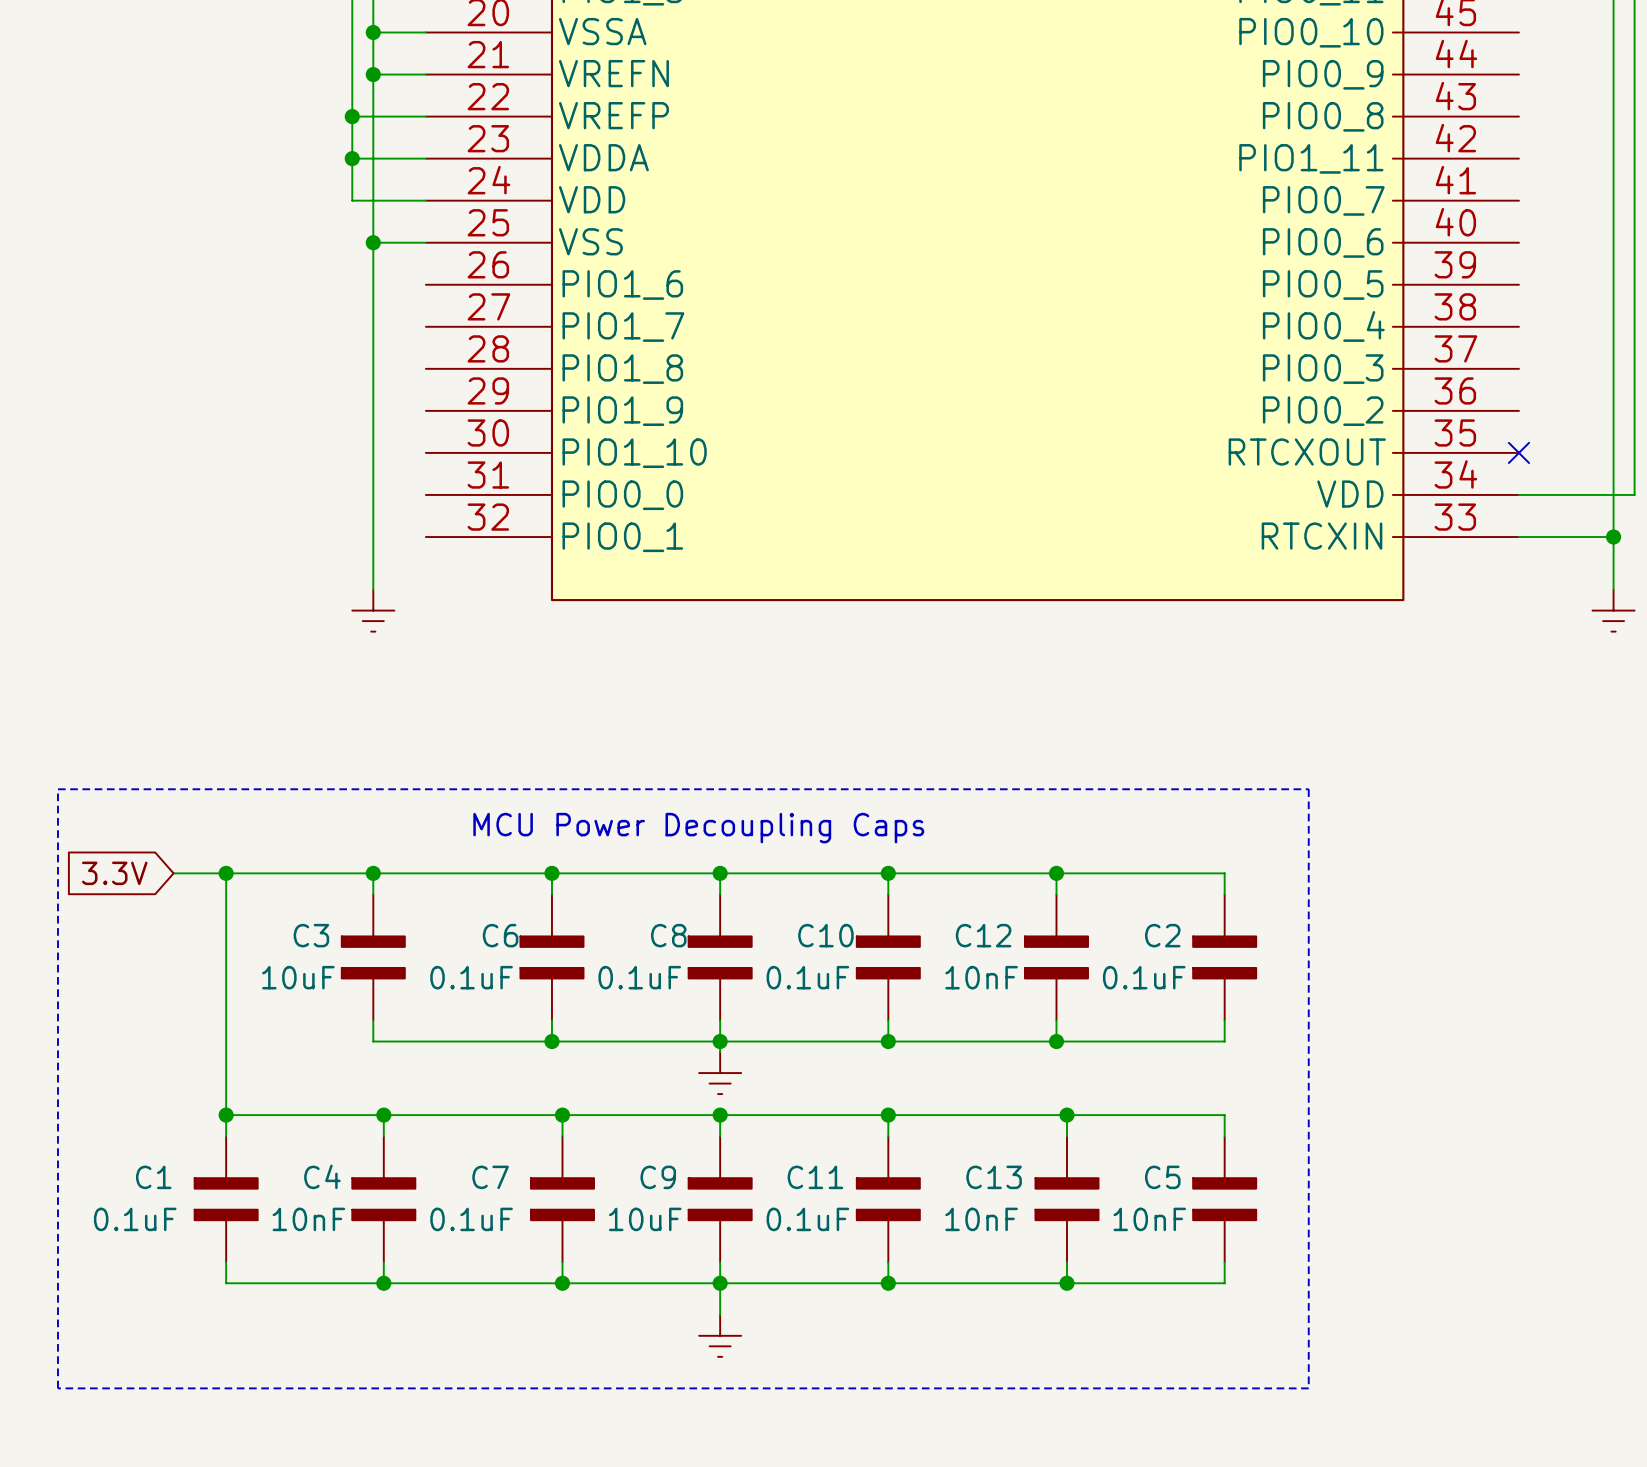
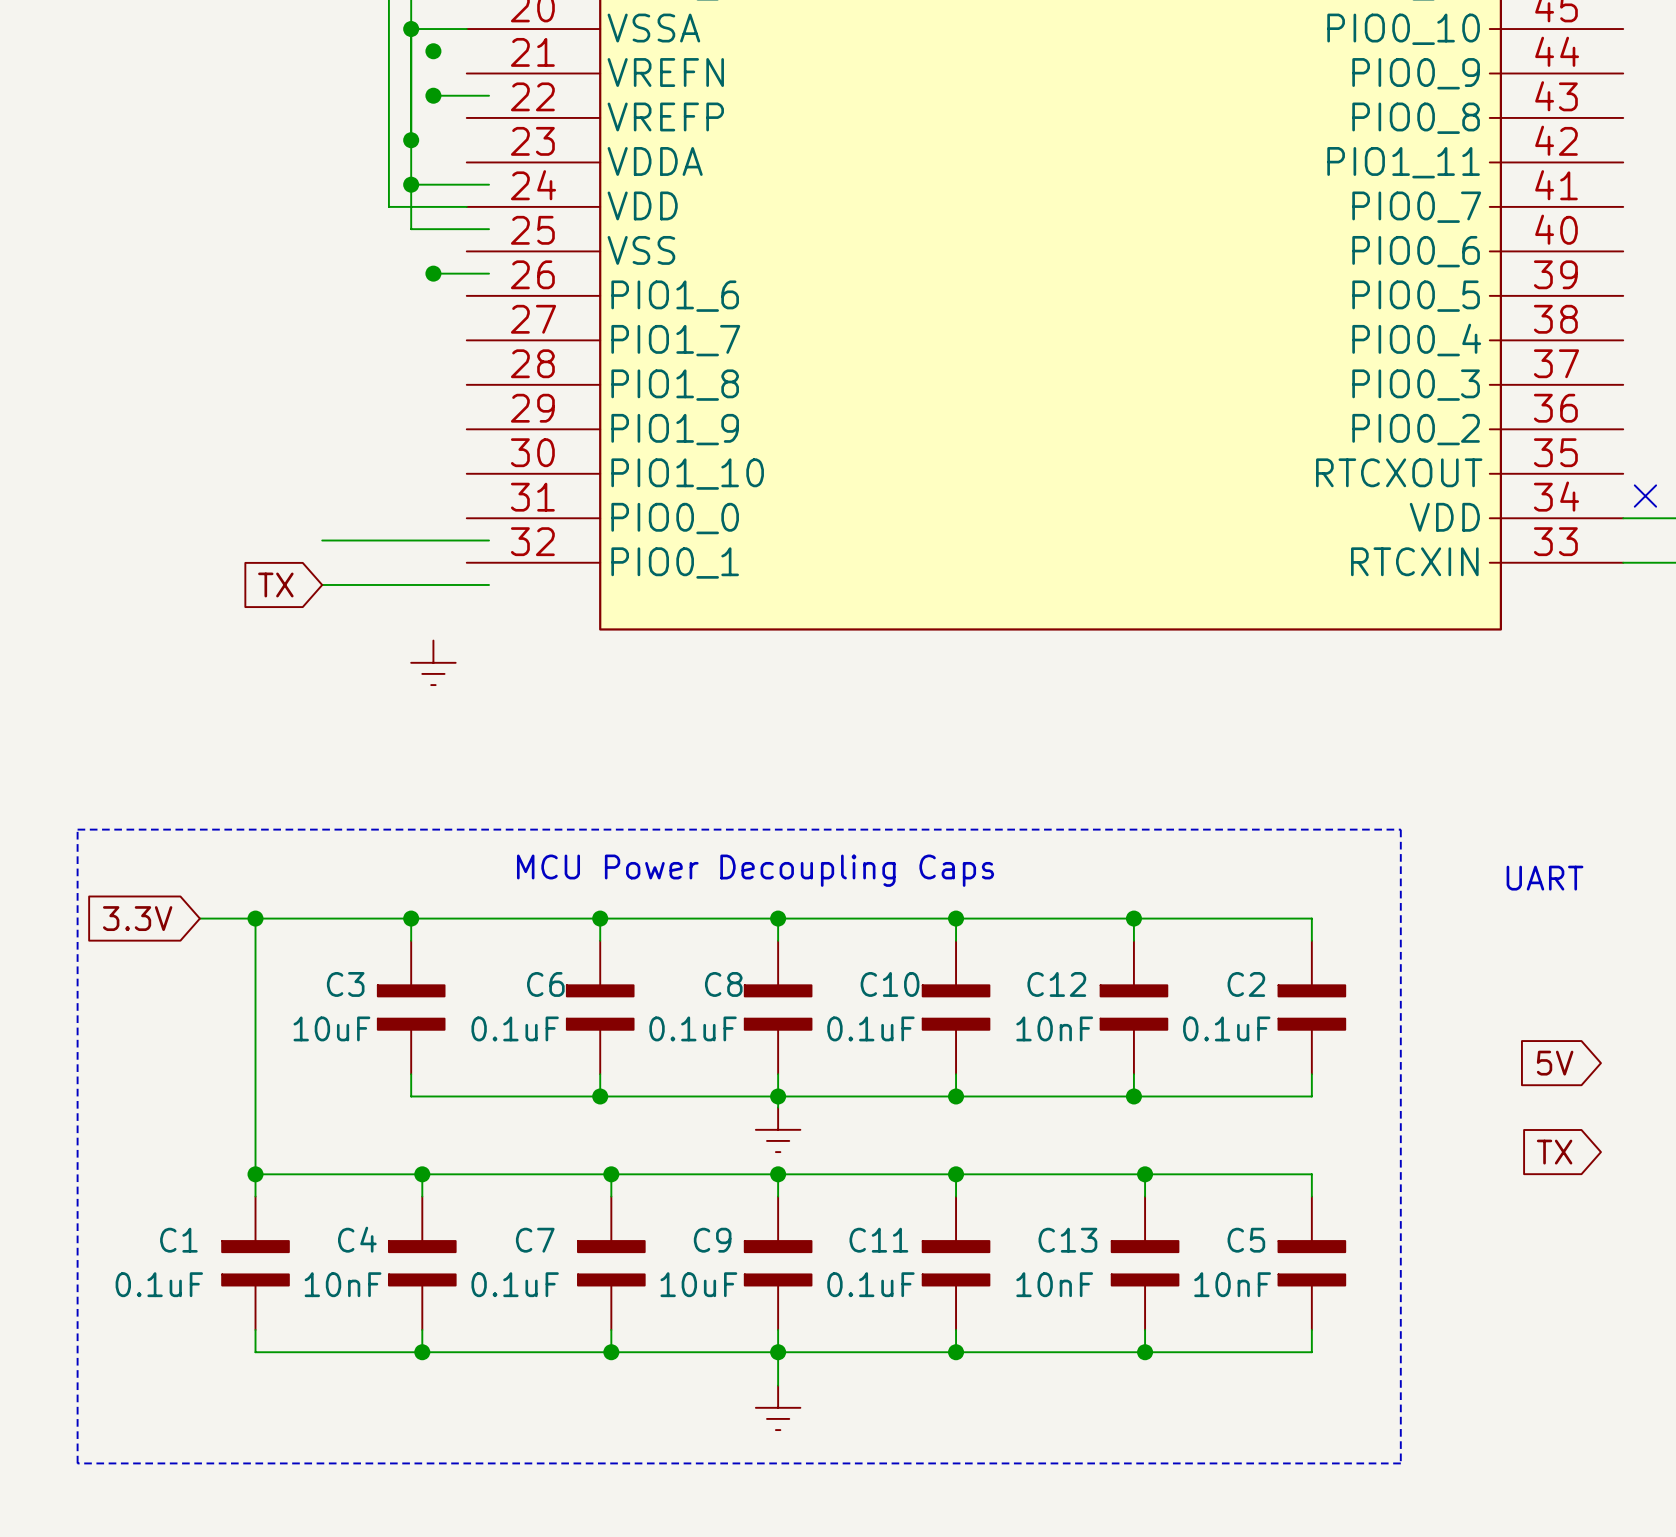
junction: none -> (433, 51)
wire: (373, 74) (425, 74) -> (433, 95) (489, 95)
junction: (373, 74) -> none
junction: none -> (433, 95)
wire: (352, 116) (425, 116) -> none
junction: (352, 116) -> none
junction: none -> (411, 140)
wire: (352, 158) (425, 158) -> (411, 184) (489, 184)
junction: (352, 158) -> none
junction: none -> (411, 184)
wire: (373, 221) (373, 589) -> (411, 229) (489, 229)
wire: (373, 242) (425, 242) -> (433, 273) (489, 273)
junction position: (373, 242) -> (433, 273)
no-connect mark position: (1518, 452) -> (1645, 496)
wire: none -> (322, 540) (489, 540)
global label: none -> TX (275, 584)
wire: none -> (322, 584) (489, 584)
power symbol position: (373, 610) -> (433, 662)
text: none -> UART (1545, 878)
global label: none -> 5V (1555, 1063)
global label: none -> TX (1554, 1152)

